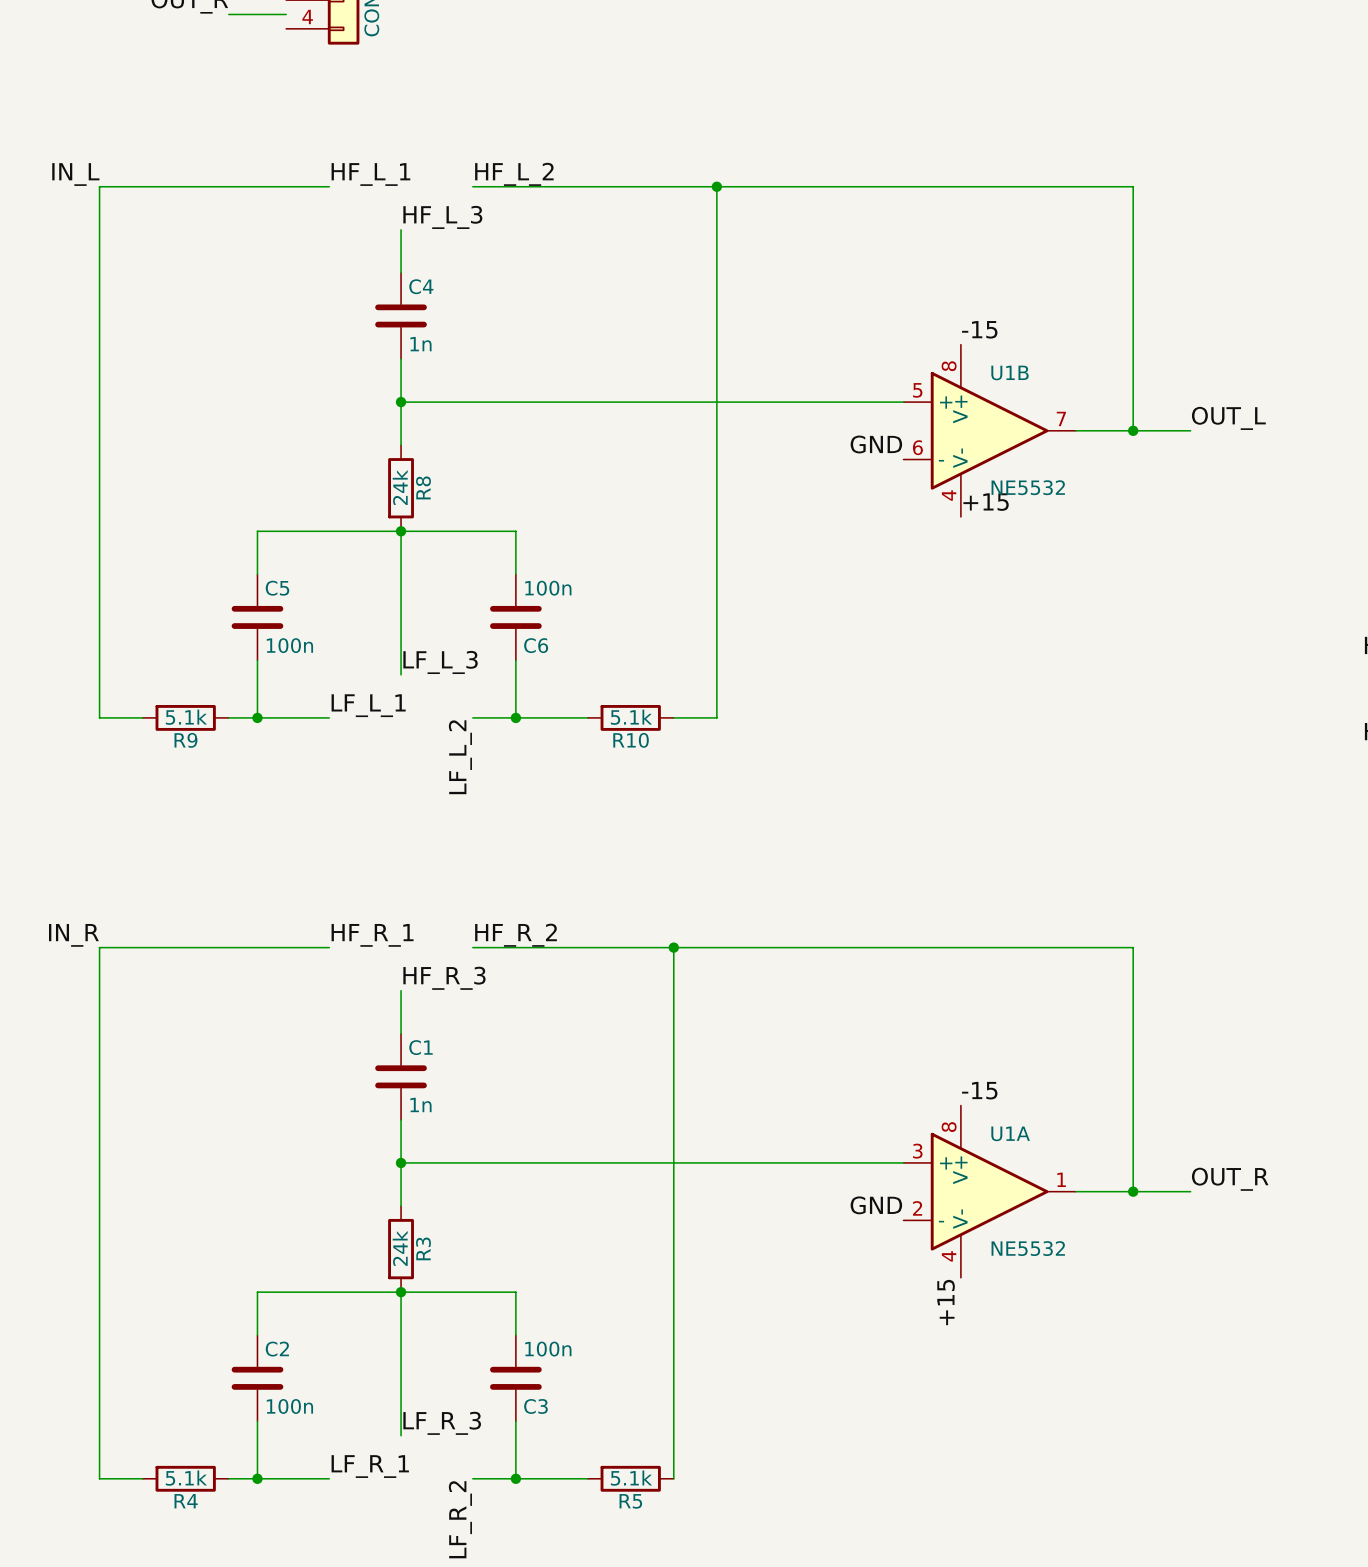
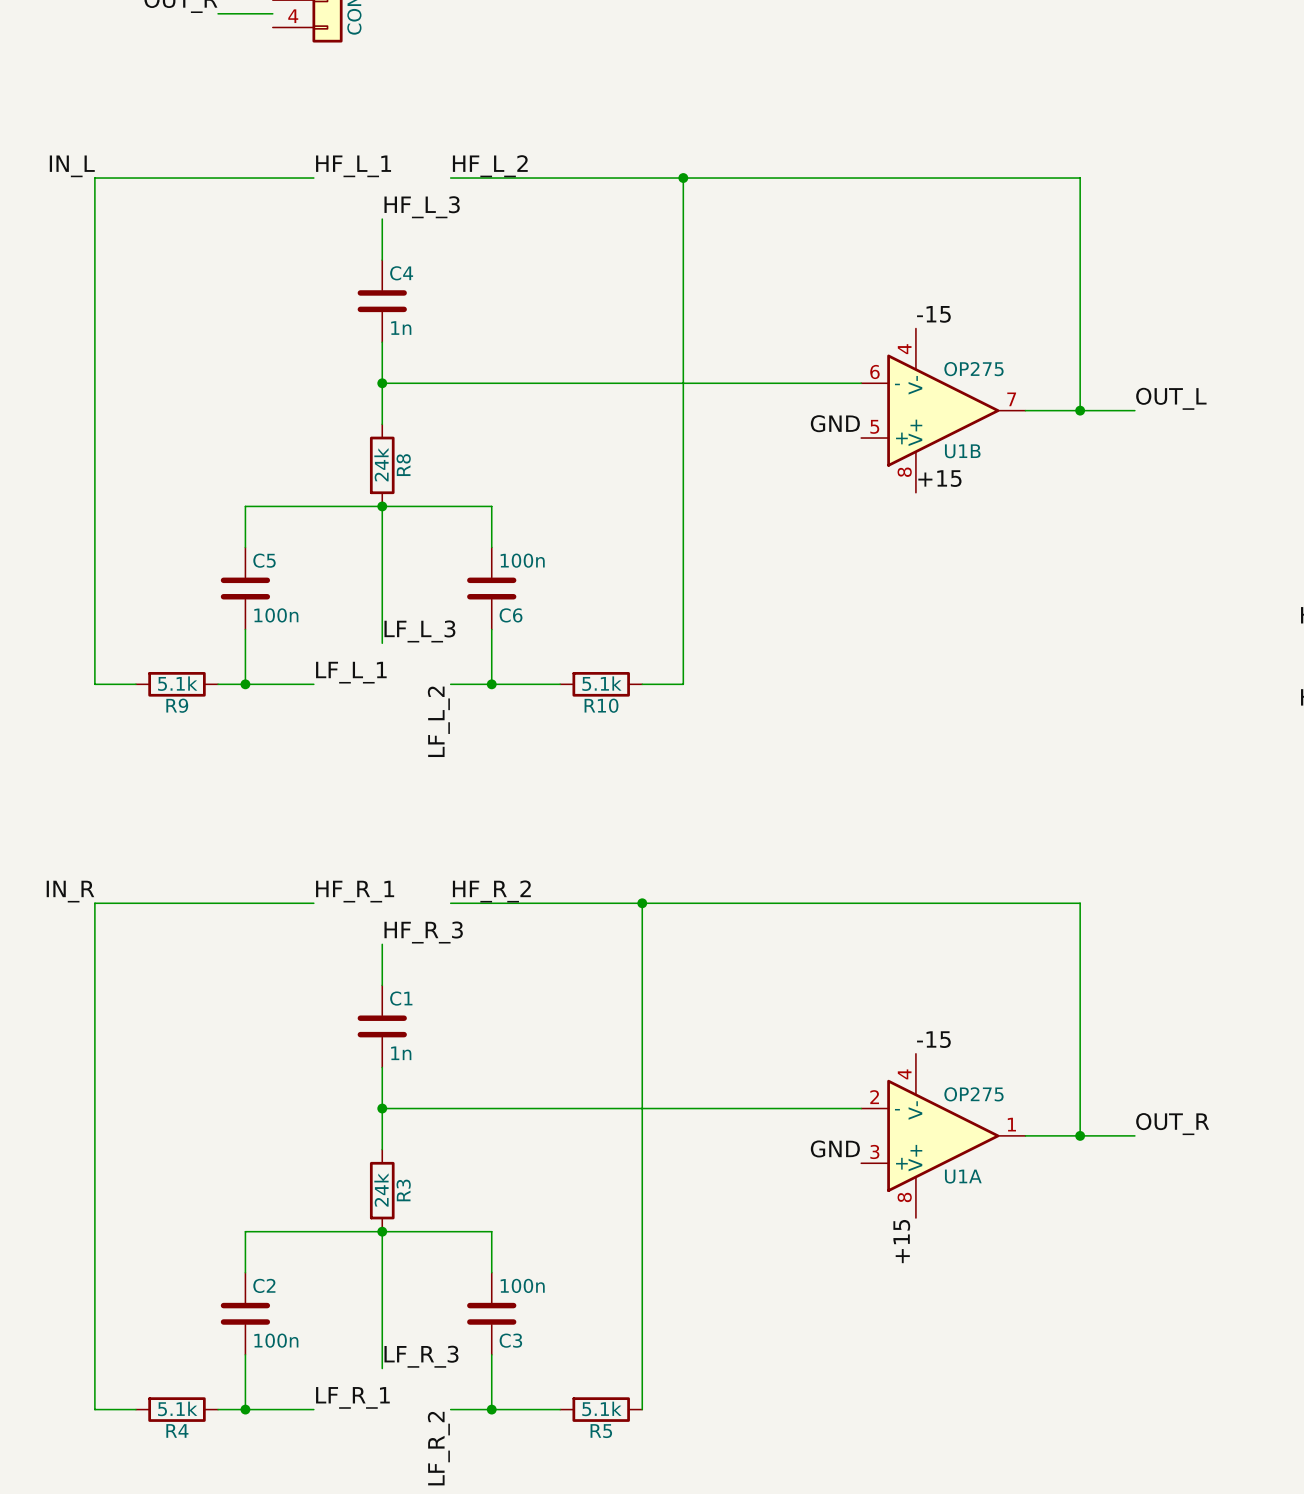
U1B flip: as is (989, 430) -> up-down (943, 410)
U1B value: NE5532 (1028, 487) -> OP275 (973, 369)
U1A flip: as is (989, 1191) -> up-down (943, 1135)
U1A value: NE5532 (1028, 1248) -> OP275 (973, 1094)

